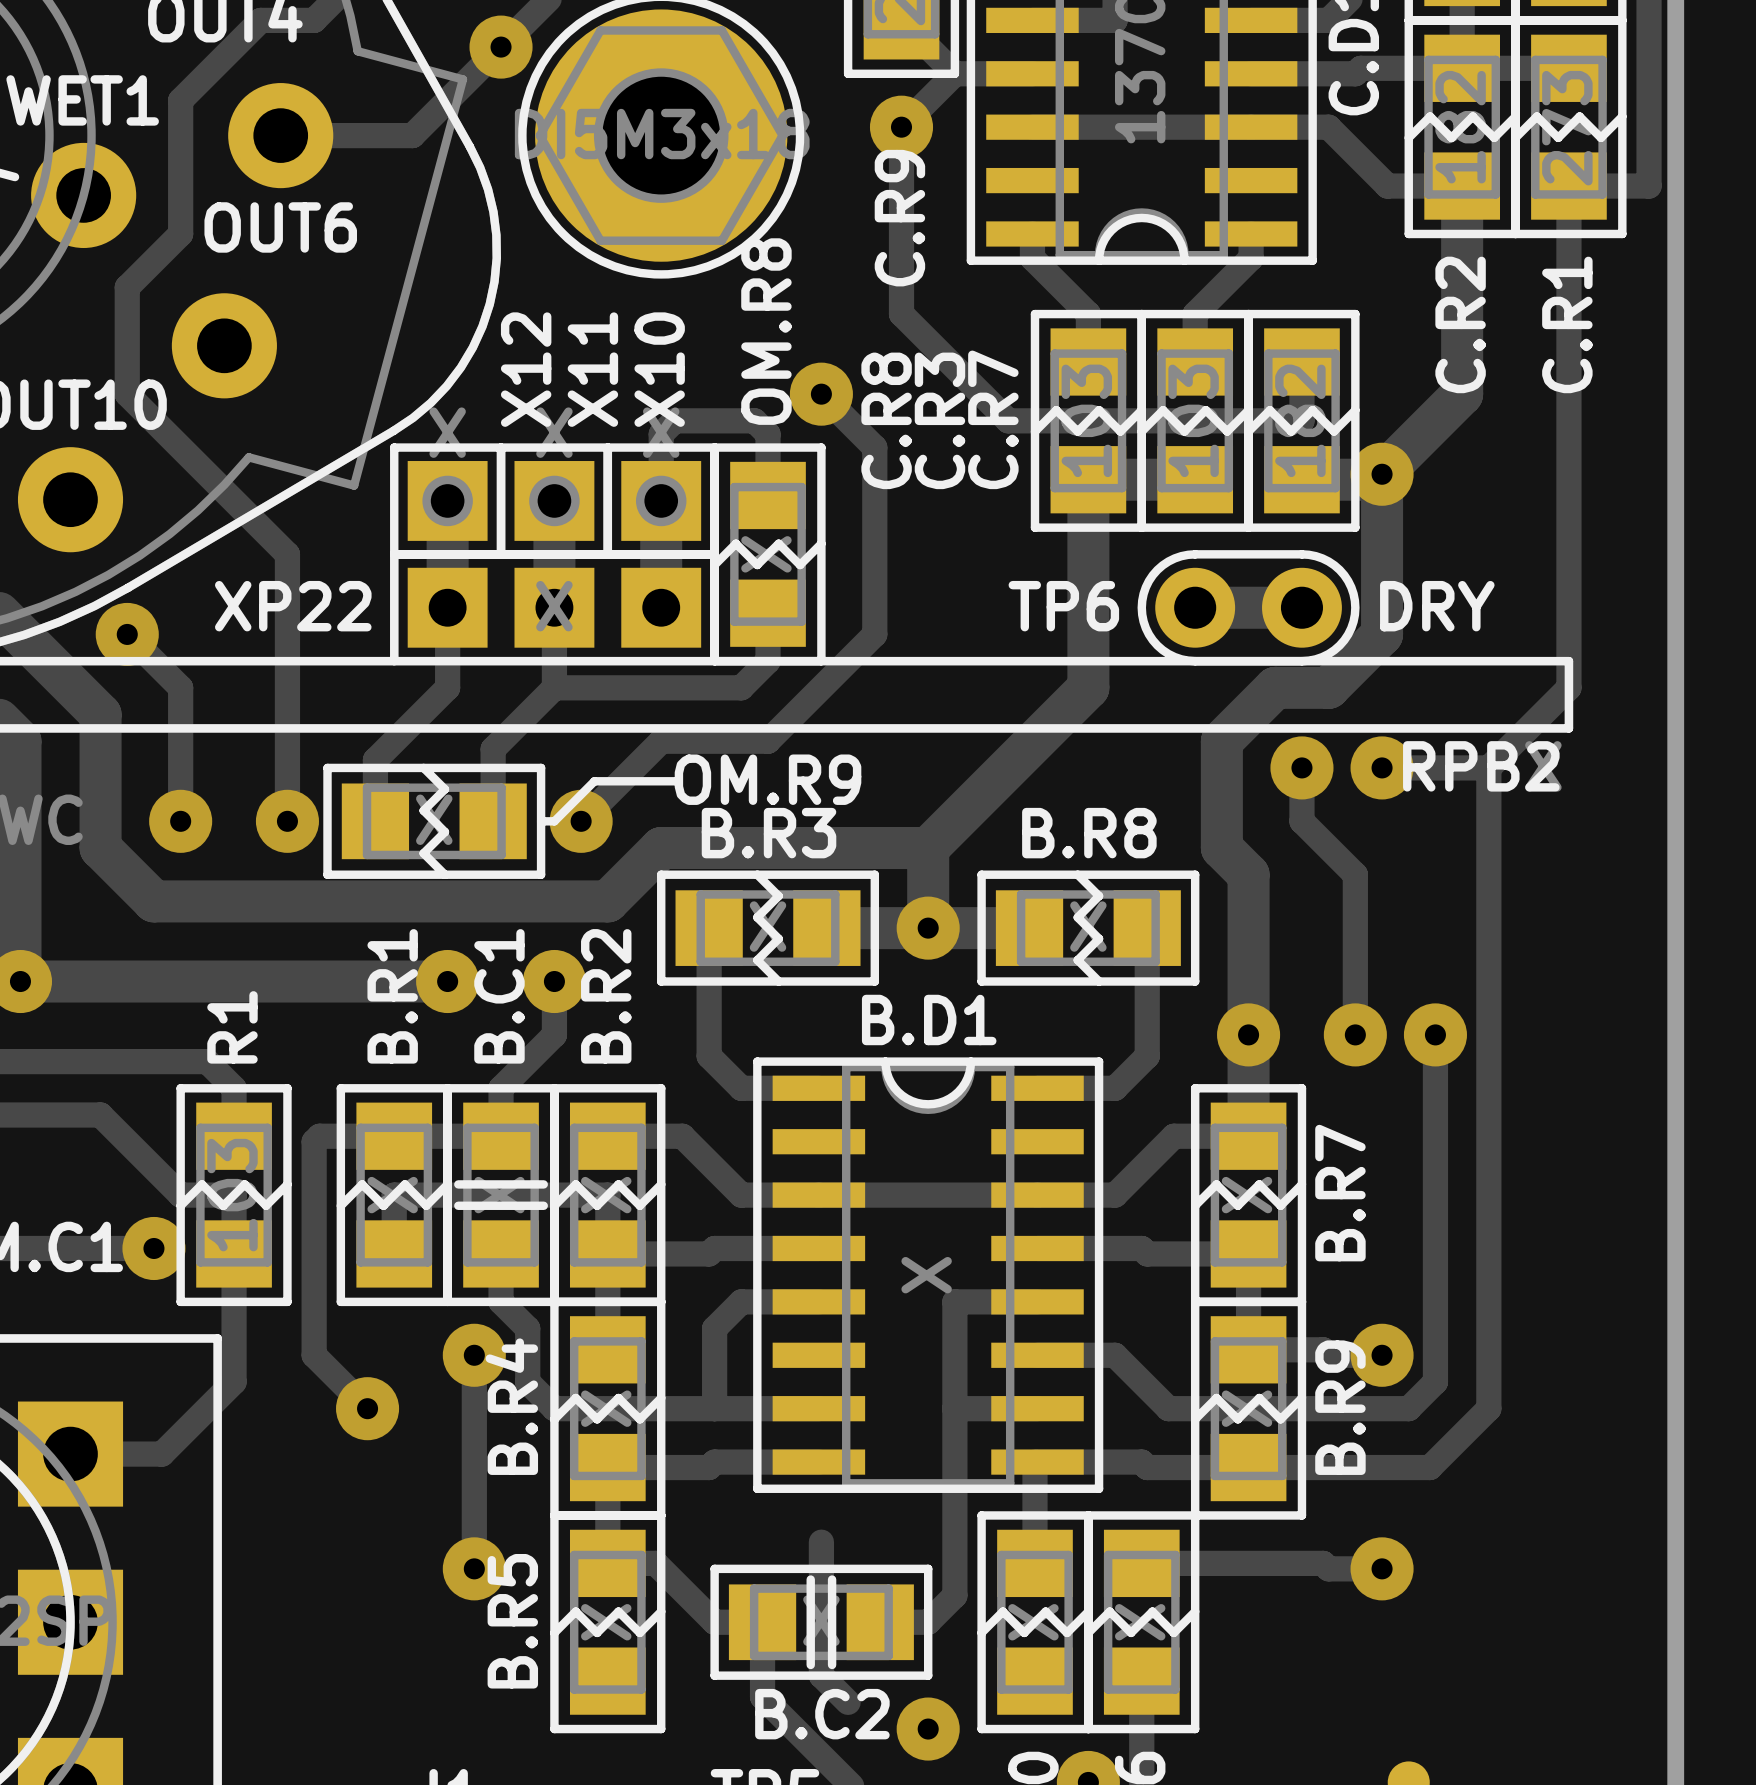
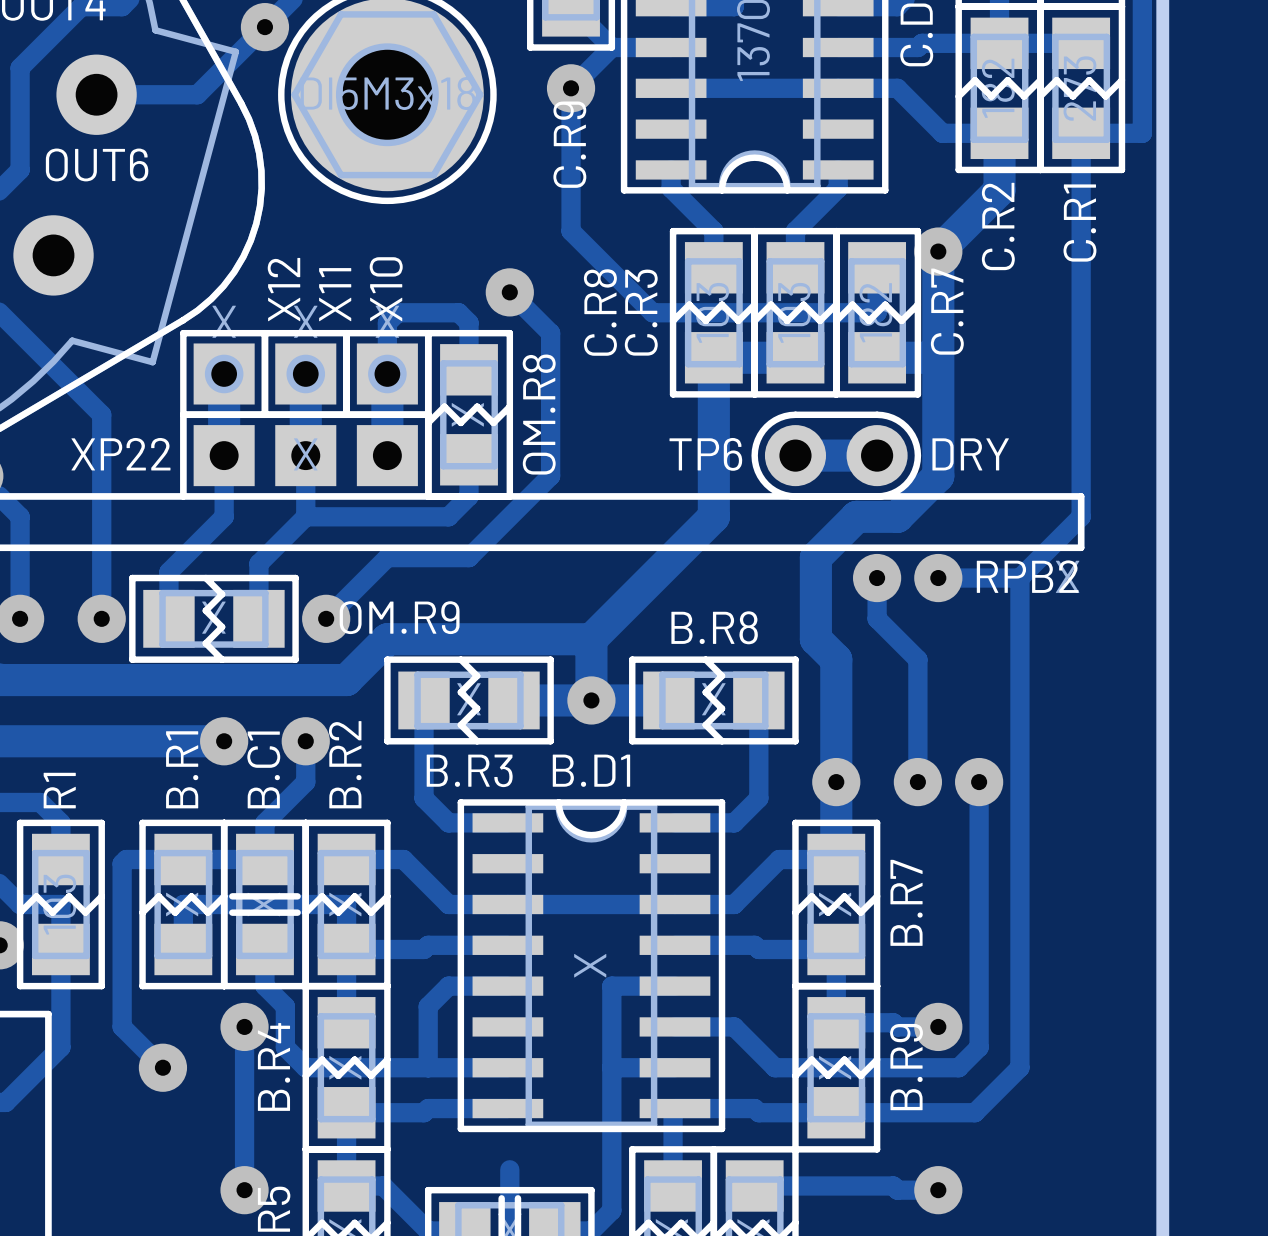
track: (1462, 260) (1462, 394) (1376, 479) -> (999, 190) (938, 251) (938, 353)
OM.R8 name position: OM.R8 (766, 331) -> OM.R8 (539, 414)
C.R7 name position: C.R7 (993, 419) -> C.R7 (947, 311)
C.R8 name position: C.R8 (886, 420) -> C.R8 (600, 312)
C.R3 name position: C.R3 (939, 420) -> C.R3 (641, 312)
via position: (1382, 474) -> (938, 251)
OM.R9 name position: OM.R9 (768, 779) -> OM.R9 (399, 617)
line: (674, 781) (594, 781) (554, 821) (541, 821) -> none
B.R3 name position: B.R3 (769, 833) -> B.R3 (469, 770)

